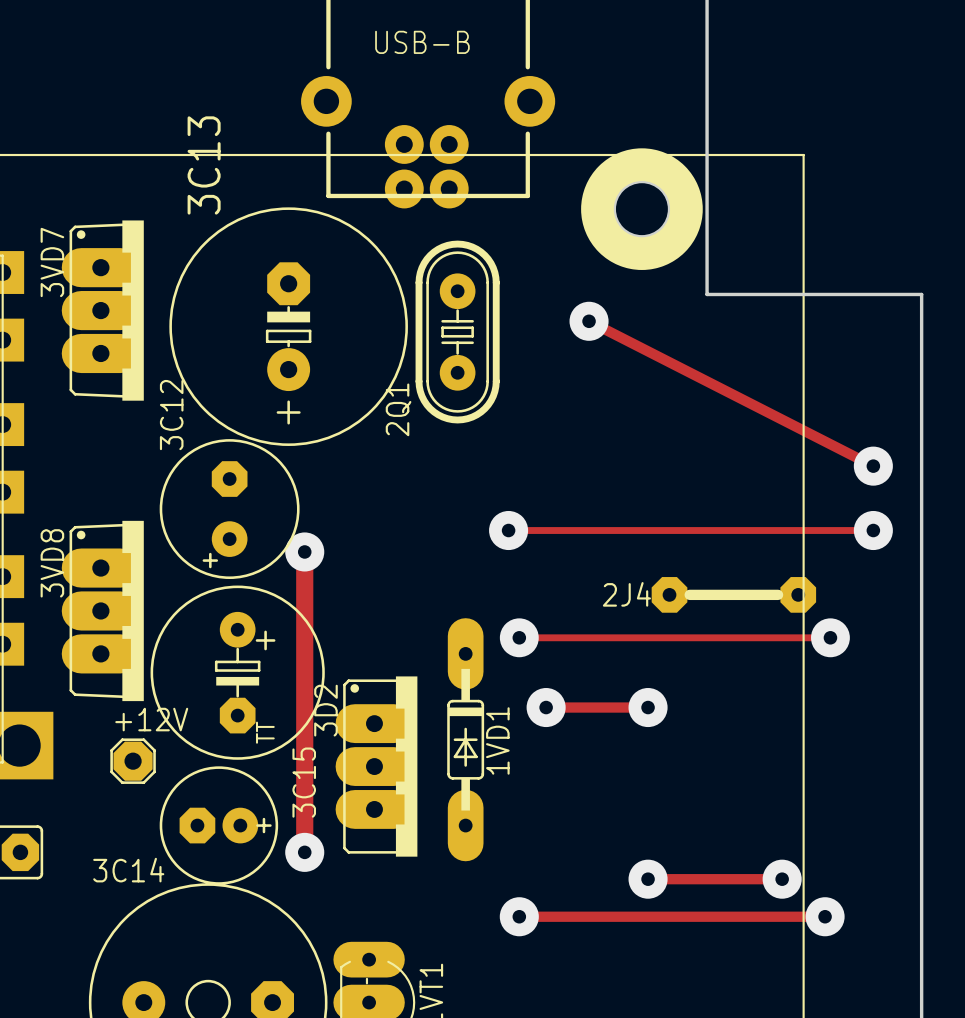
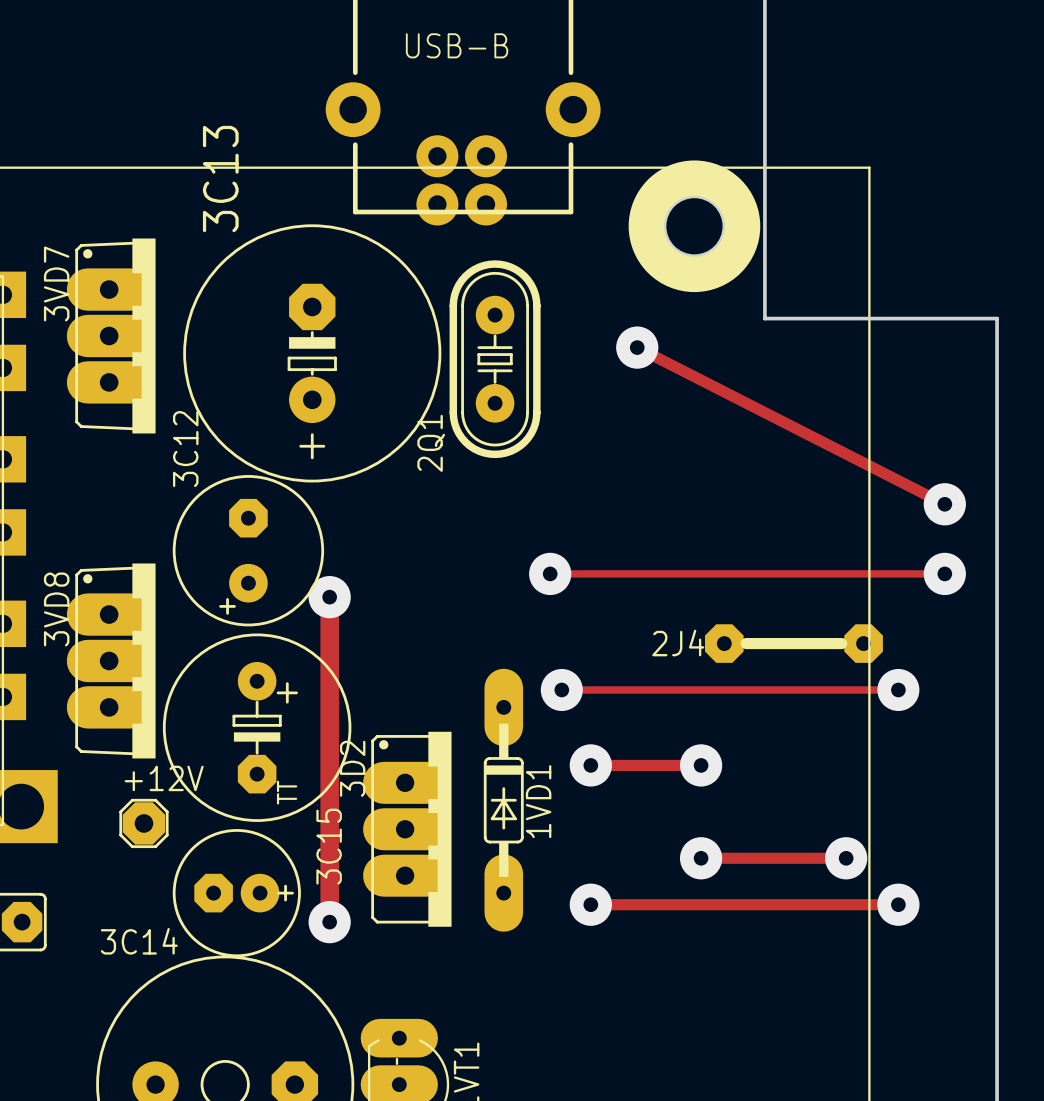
via: none -> (701, 858)
via: none -> (846, 858)
track: none -> (590, 904) (898, 904)
via: none -> (590, 904)
via: none -> (898, 904)
track: (648, 879) (782, 879) -> (701, 858) (846, 858)
via: (648, 879) -> none
via: (782, 879) -> none
track: (519, 916) (825, 916) -> none
via: (519, 916) -> none
via: (825, 916) -> none

